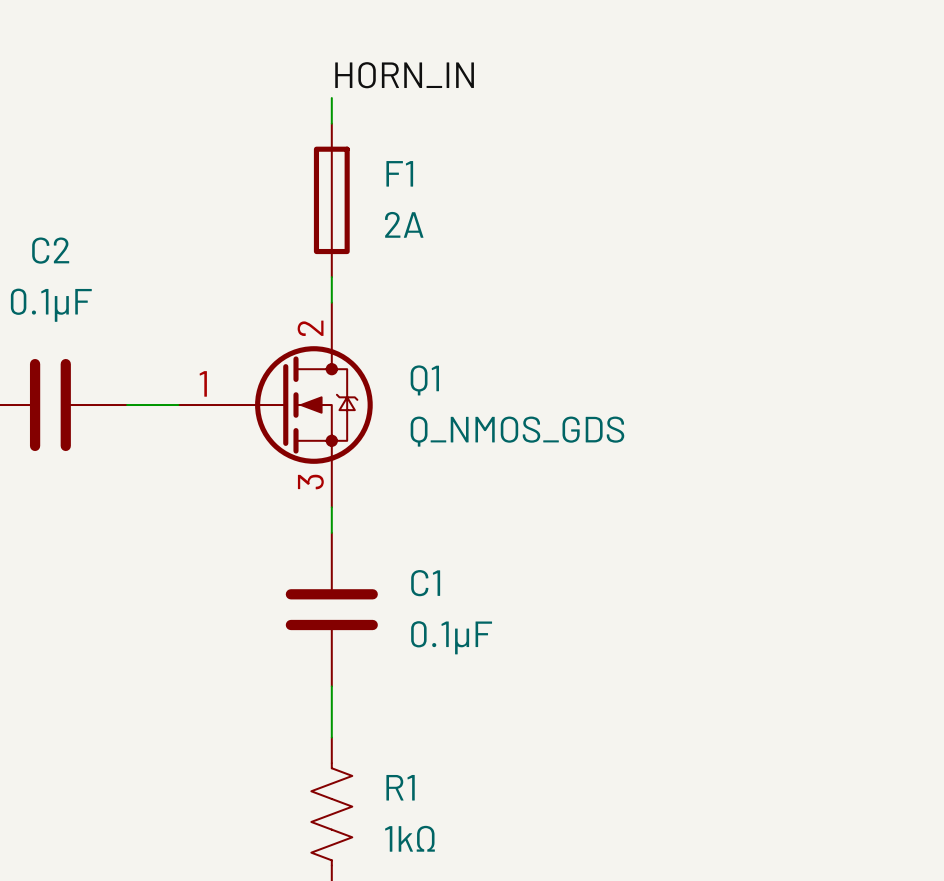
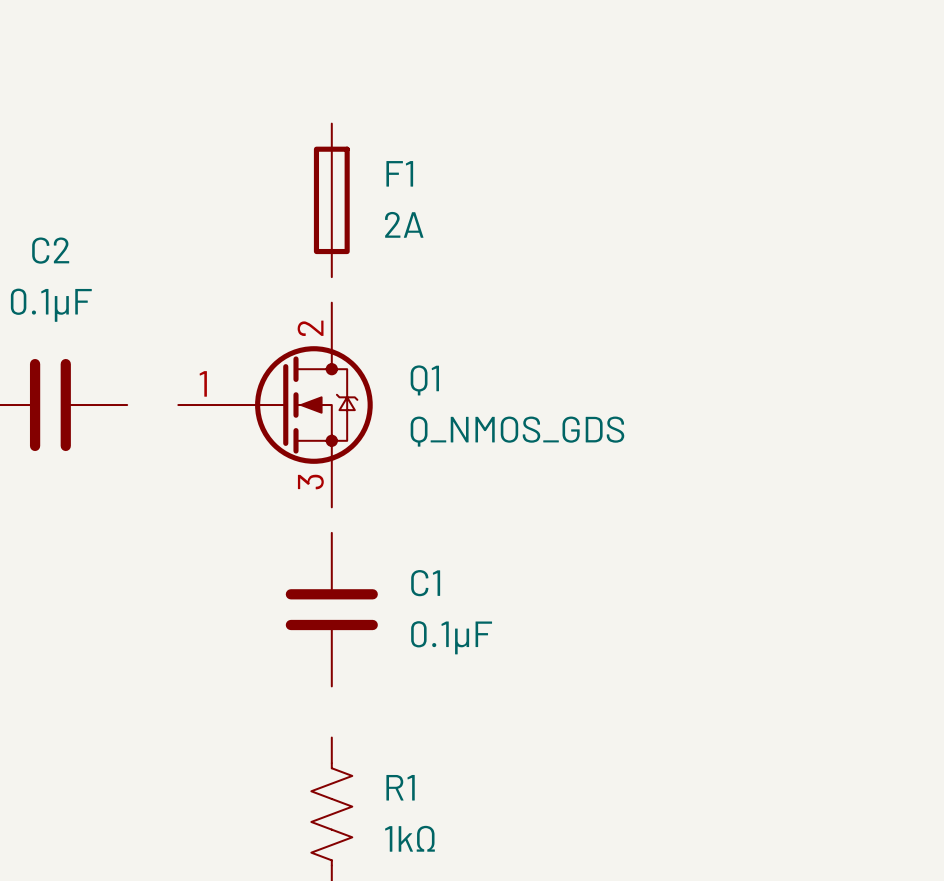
label: HORN_IN (404, 75) -> none
wire: (331, 98) (331, 123) -> none
wire: (331, 277) (331, 302) -> none
wire: (127, 405) (178, 405) -> none
wire: (331, 507) (331, 532) -> none
wire: (331, 686) (331, 737) -> none

